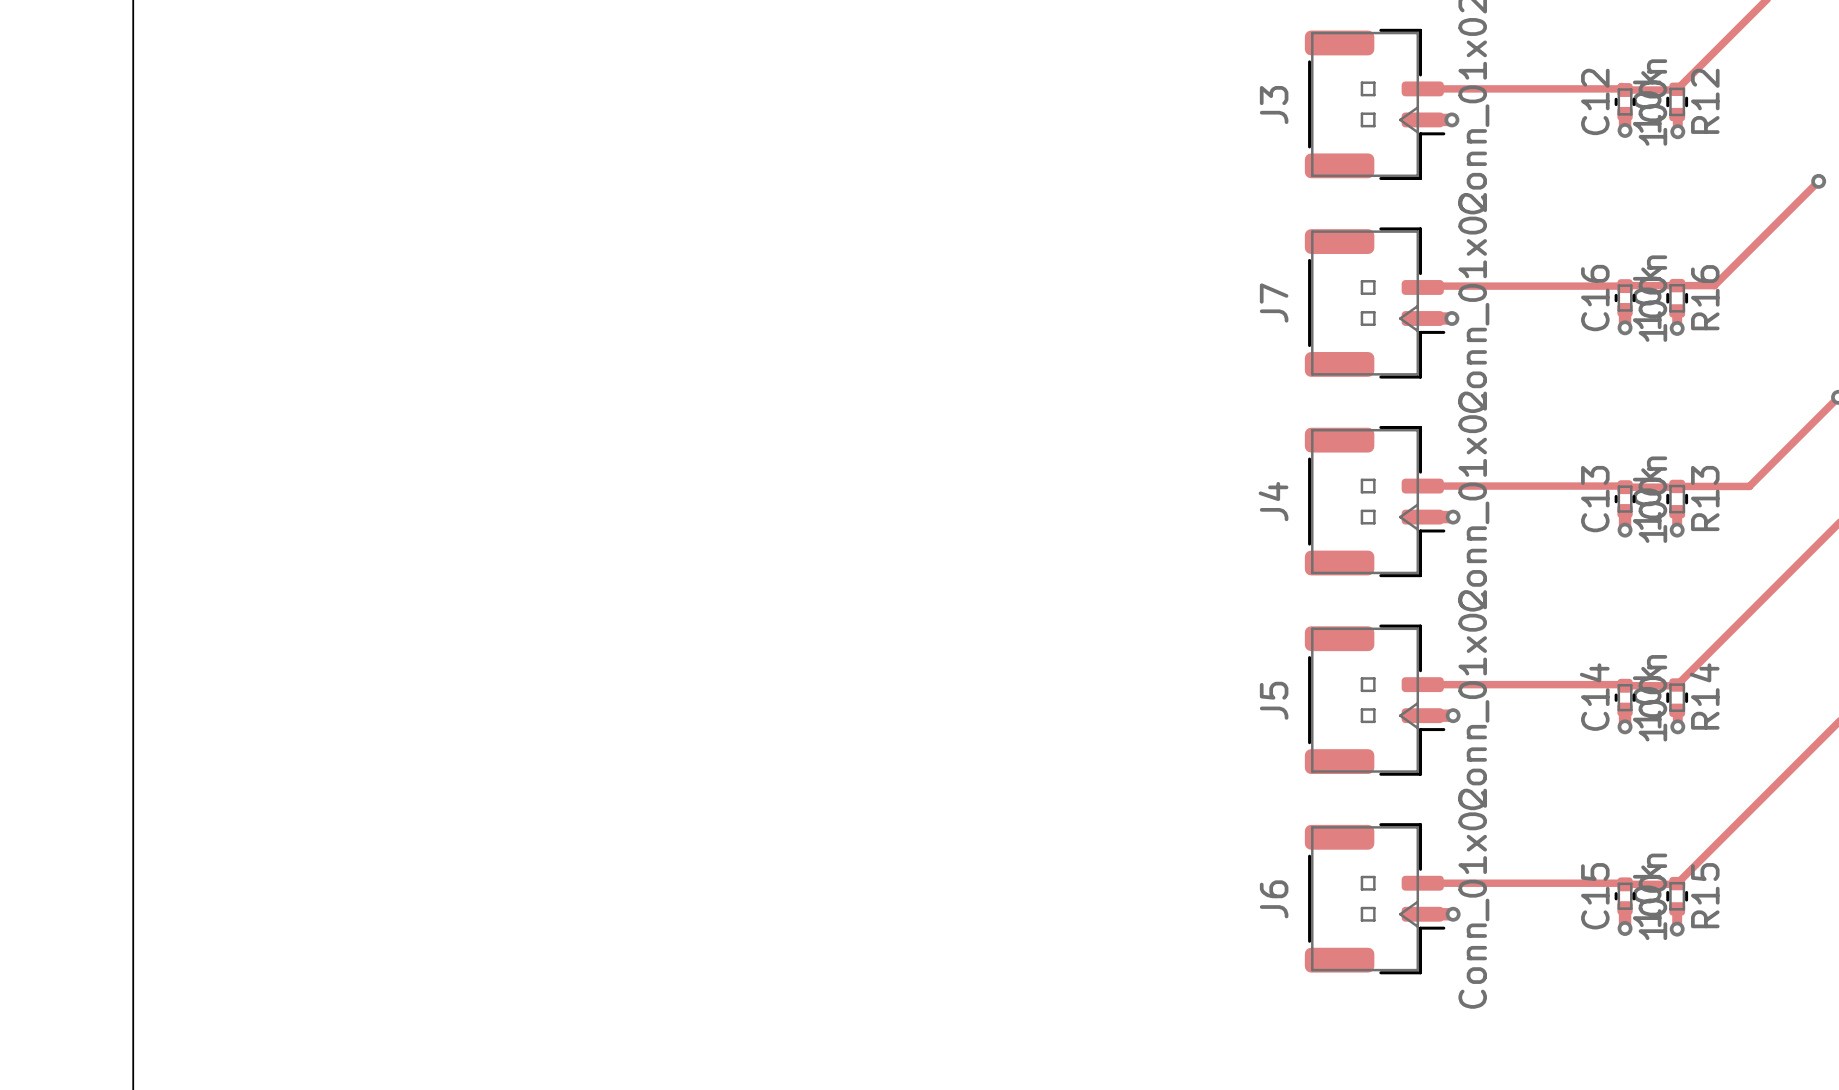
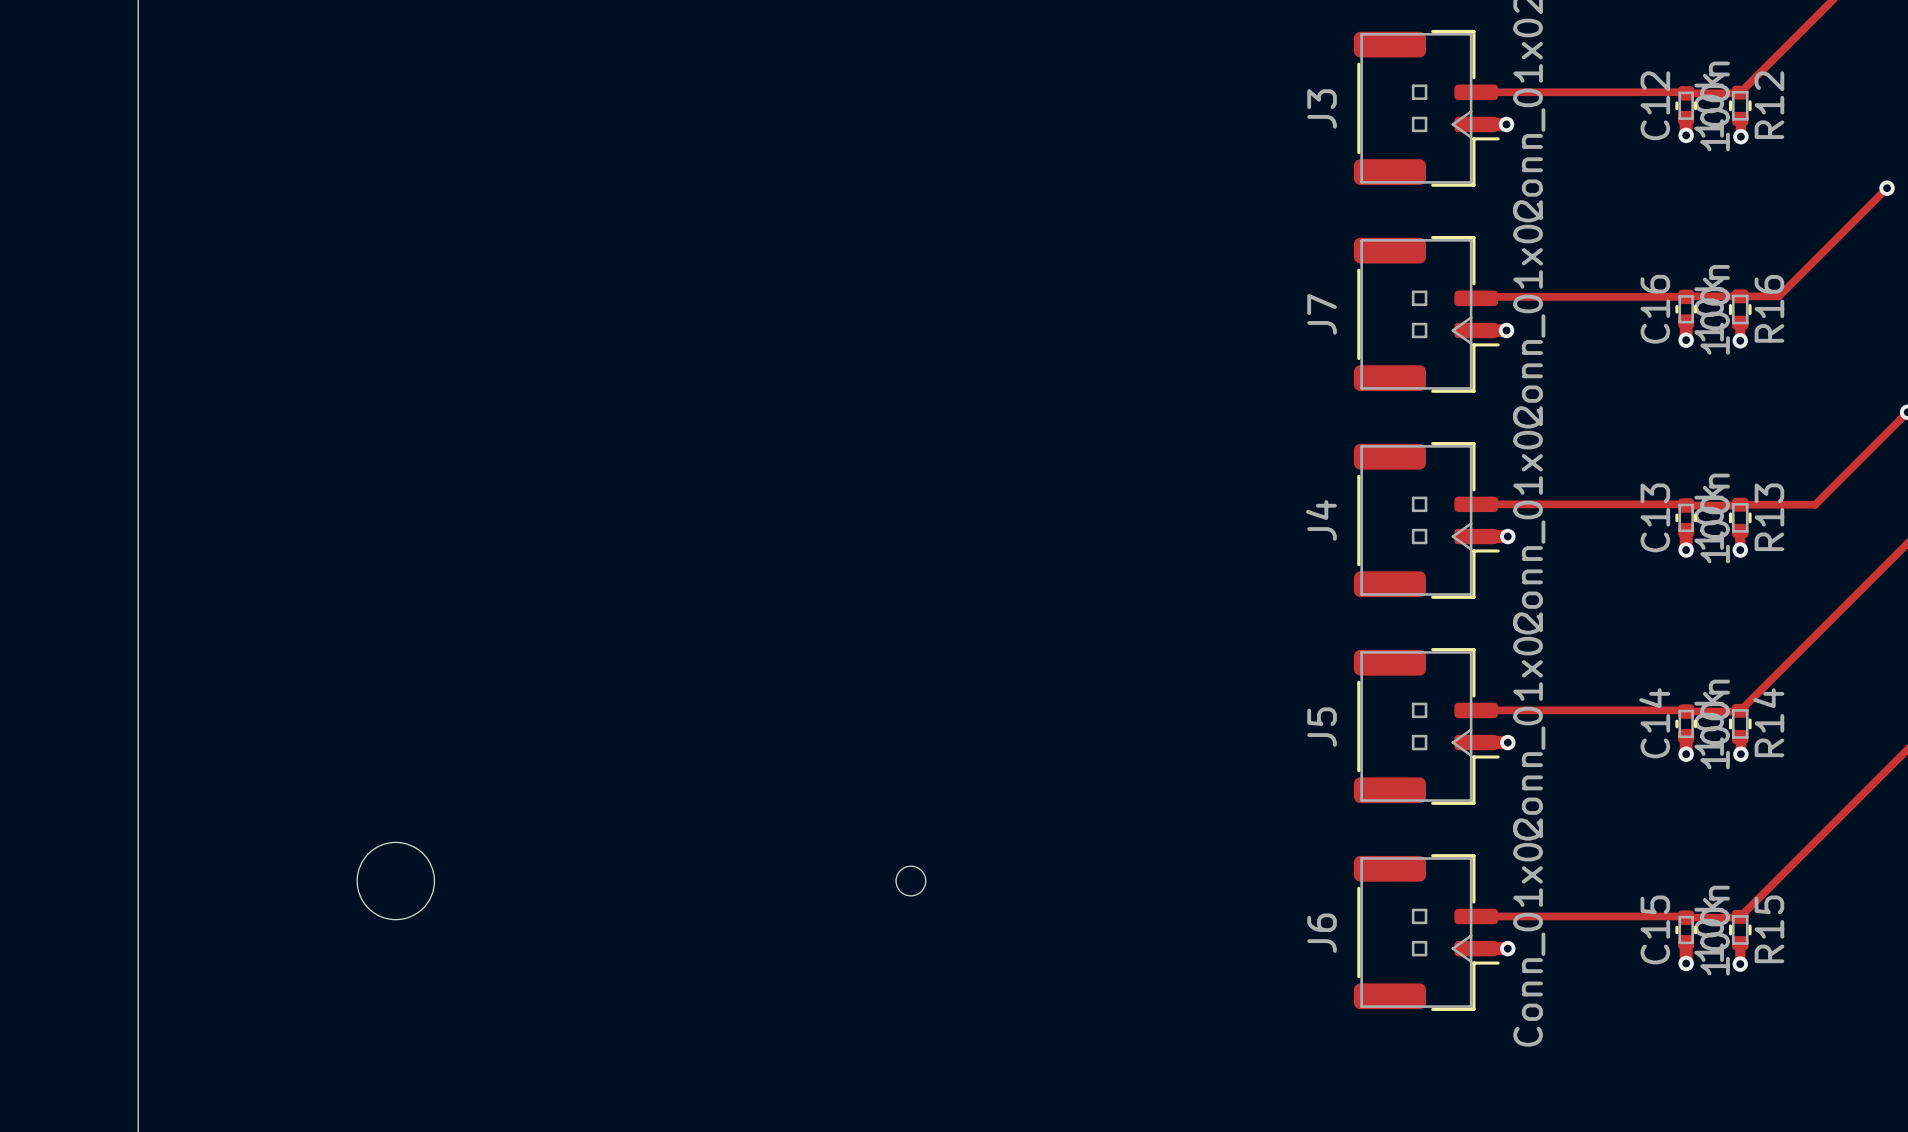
round board edge: none -> [356, 841, 436, 921]
round board edge: none -> [895, 865, 927, 897]

